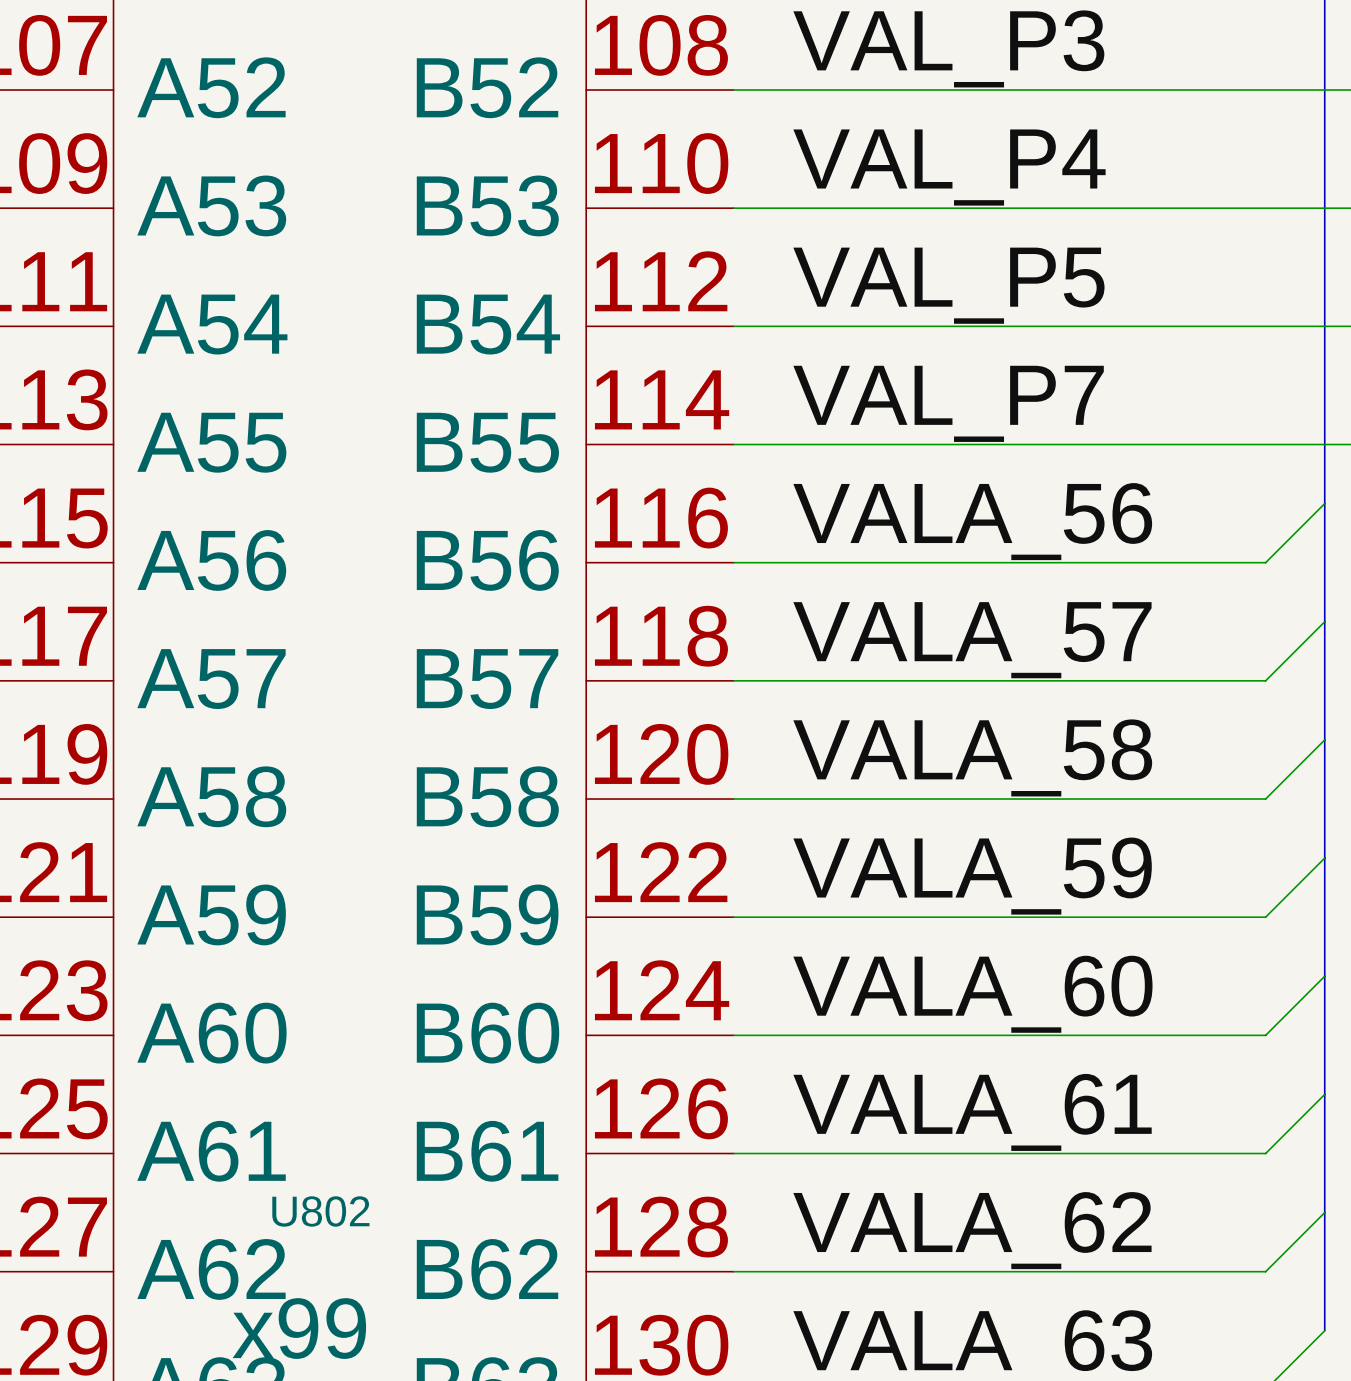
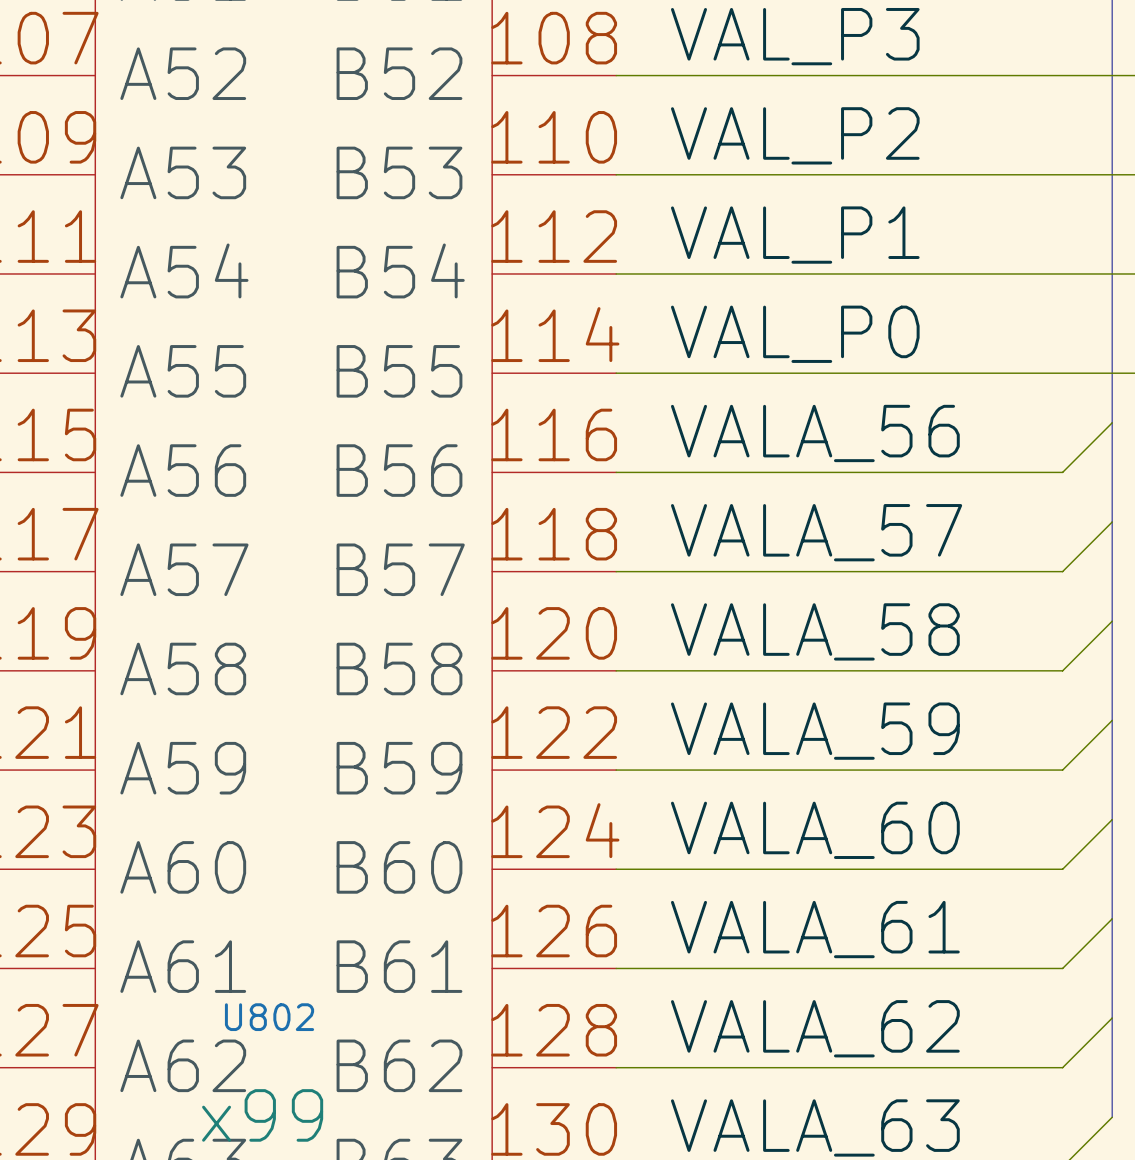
label: VAL_P4 (949, 167) -> VAL_P2 (795, 135)
label: VAL_P5 (948, 285) -> VAL_P1 (795, 235)
label: VAL_P7 (948, 403) -> VAL_P0 (795, 334)

